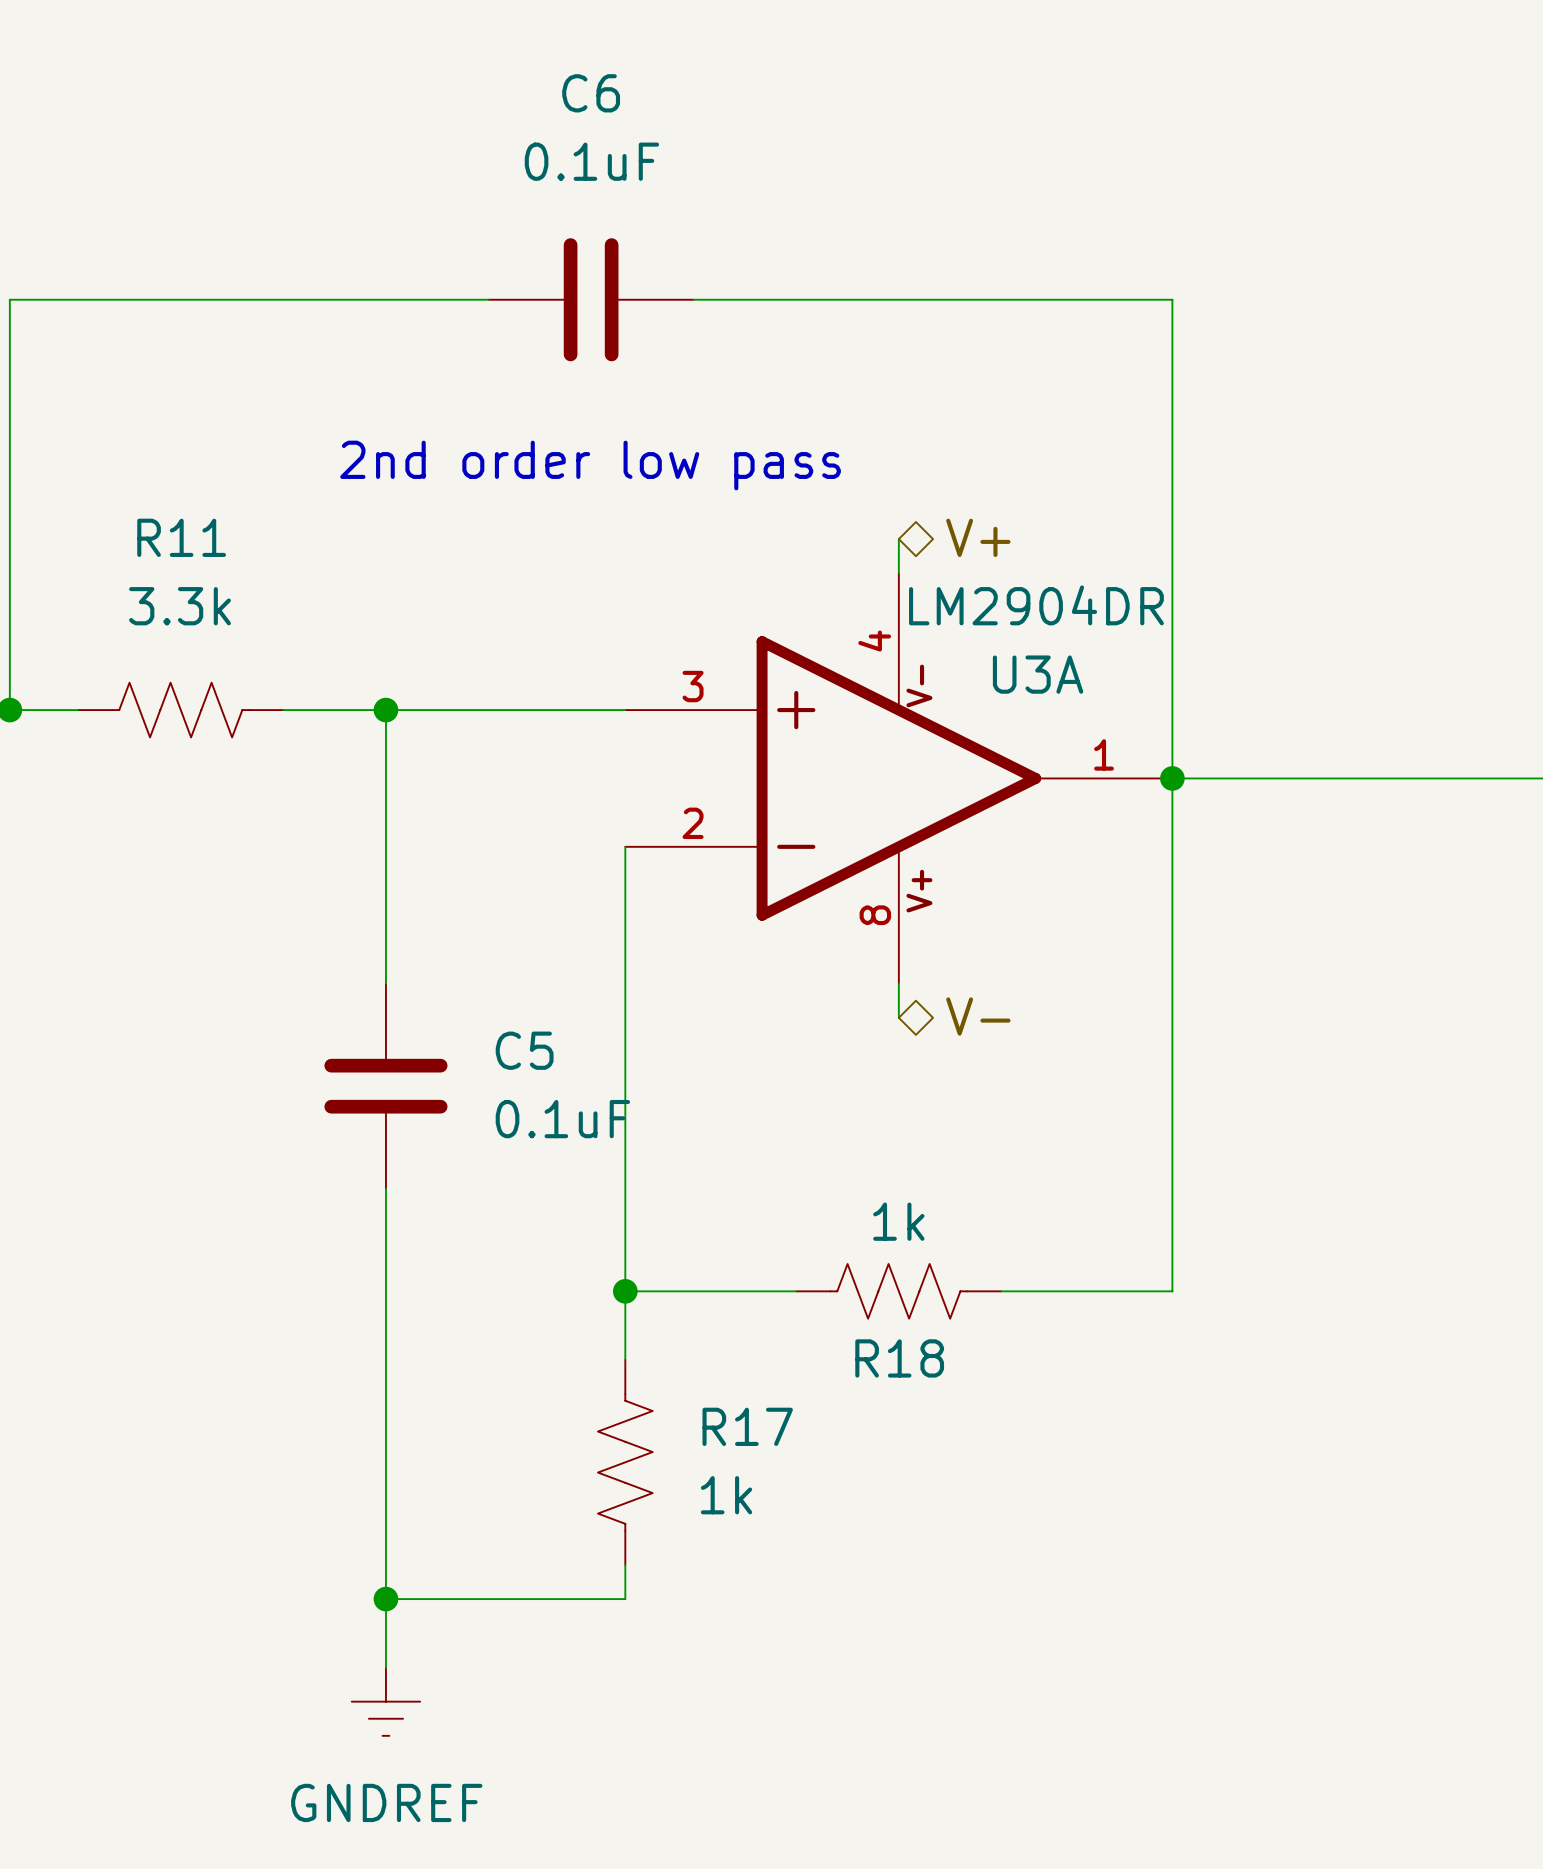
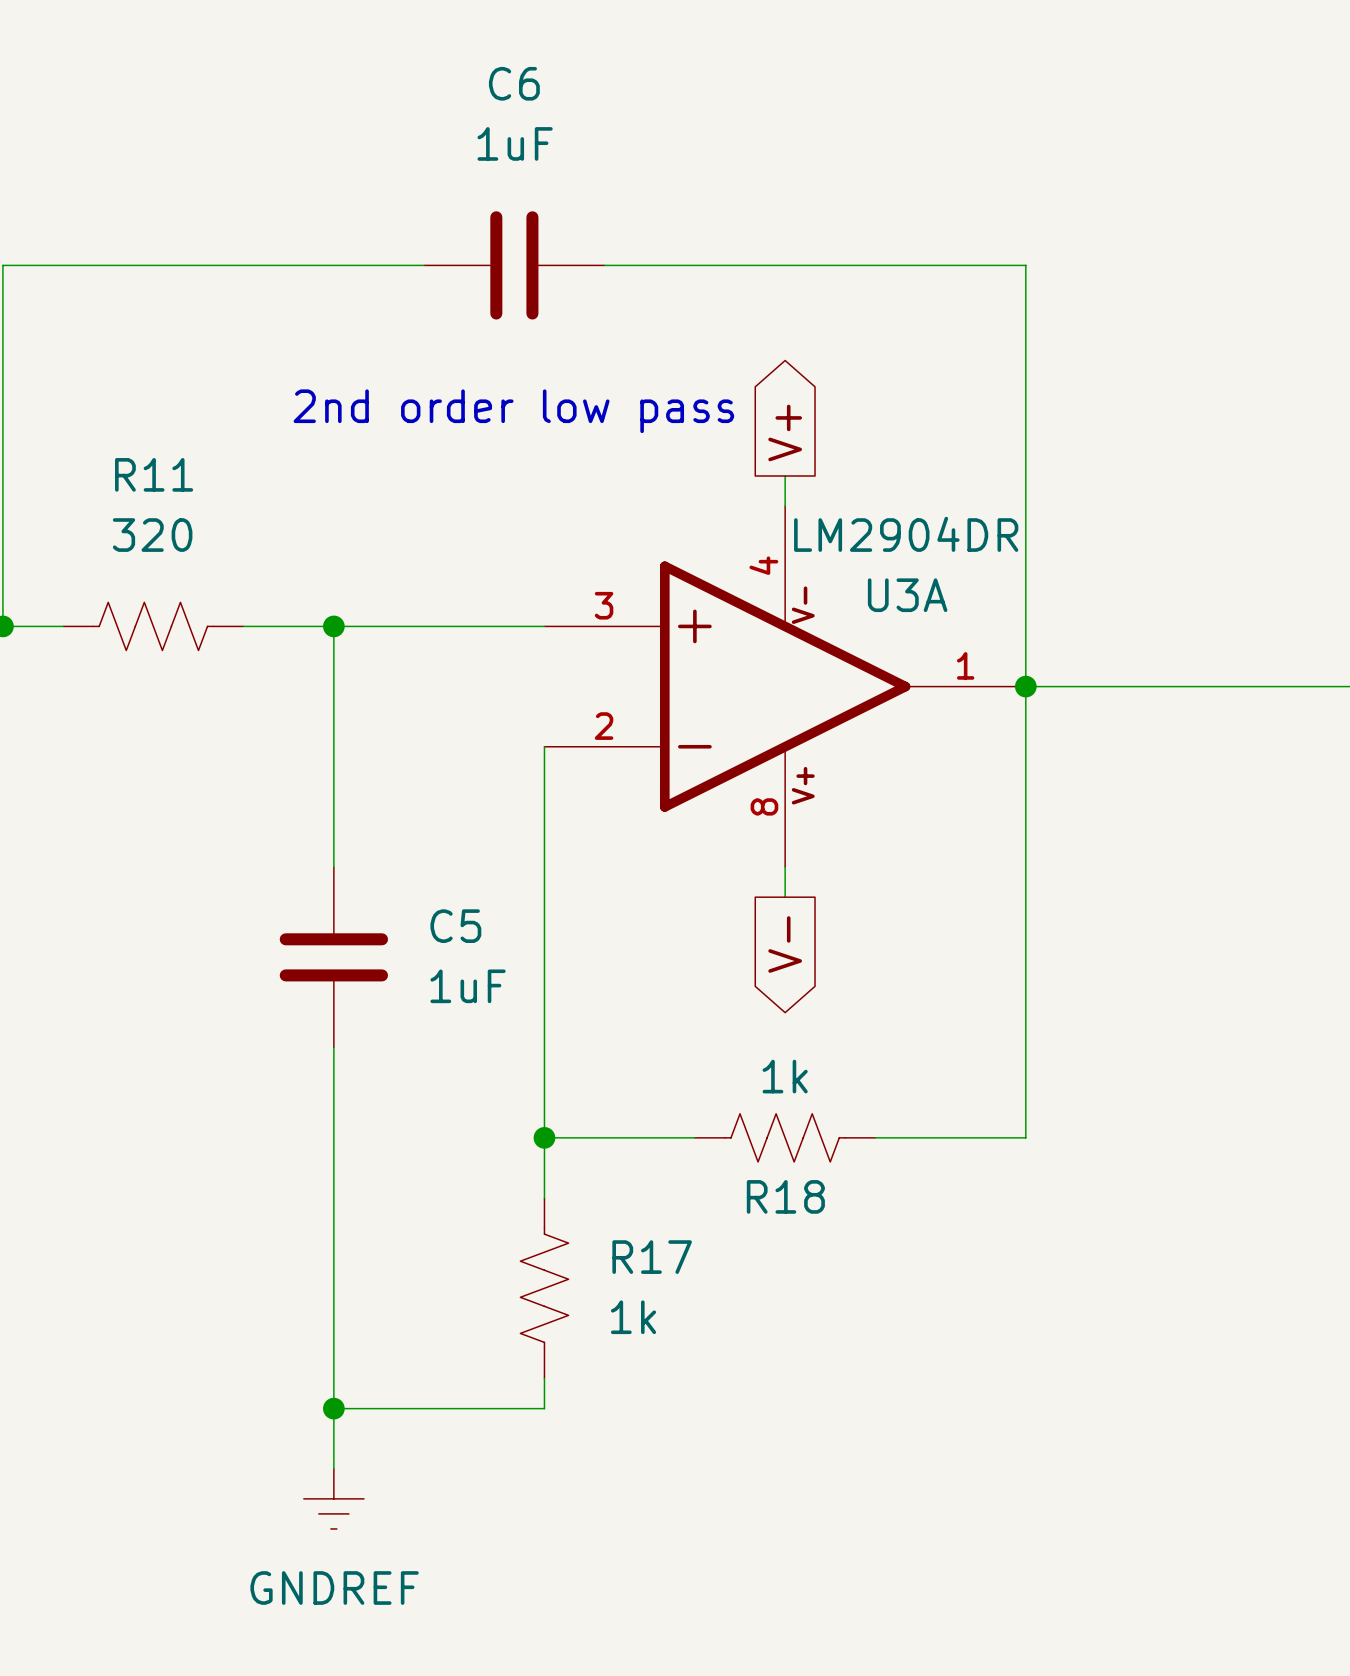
C6 value: 0.1uF (591, 161) -> 1uF (515, 143)
global label: none -> V+ (785, 432)
hierarchical label: V+ (978, 537) -> none
R11 value: 3.3k (179, 606) -> 320 (152, 535)
hierarchical label: V- (978, 1016) -> none
global label: none -> V- (785, 944)
C5 value: 0.1uF (562, 1119) -> 1uF (468, 986)

